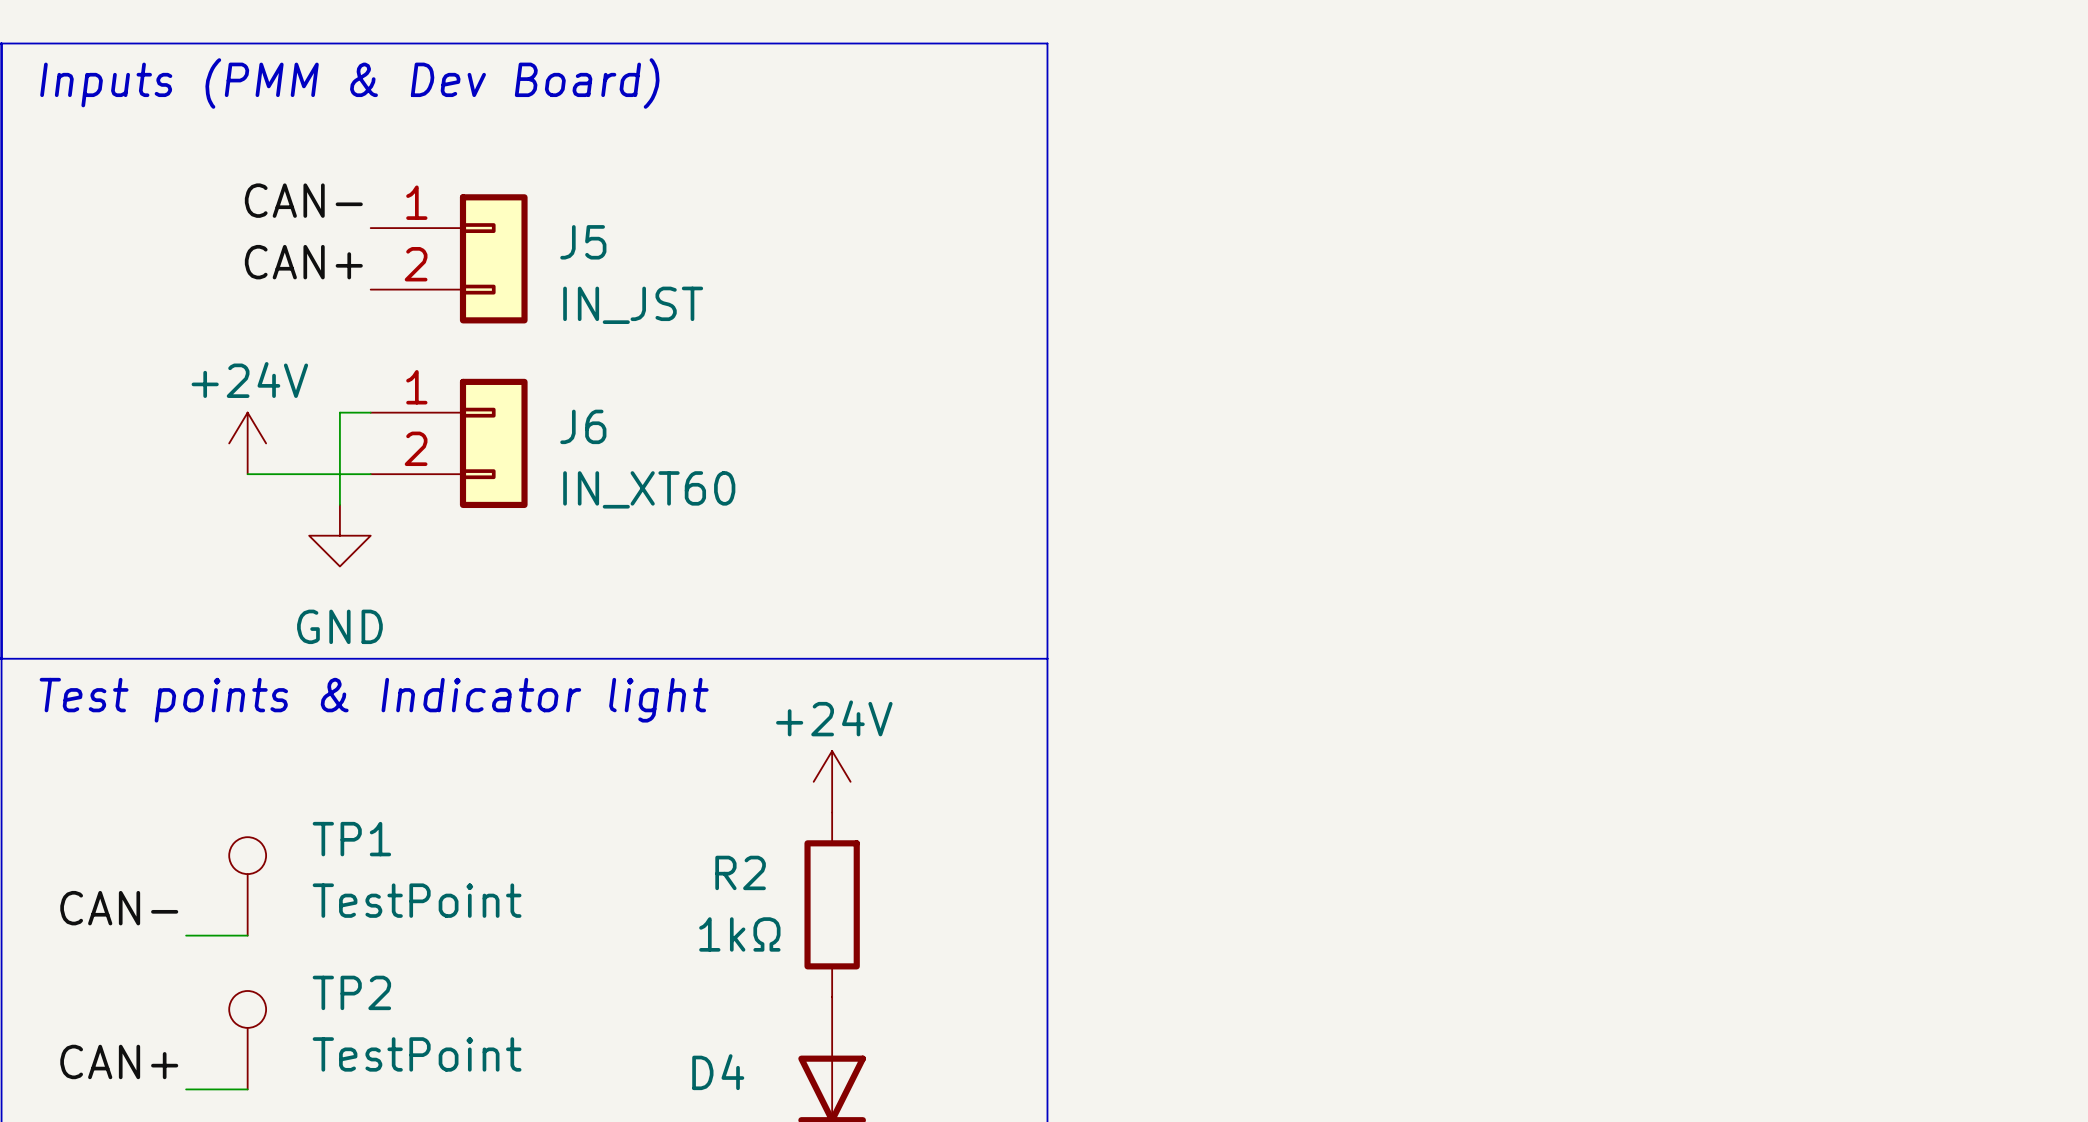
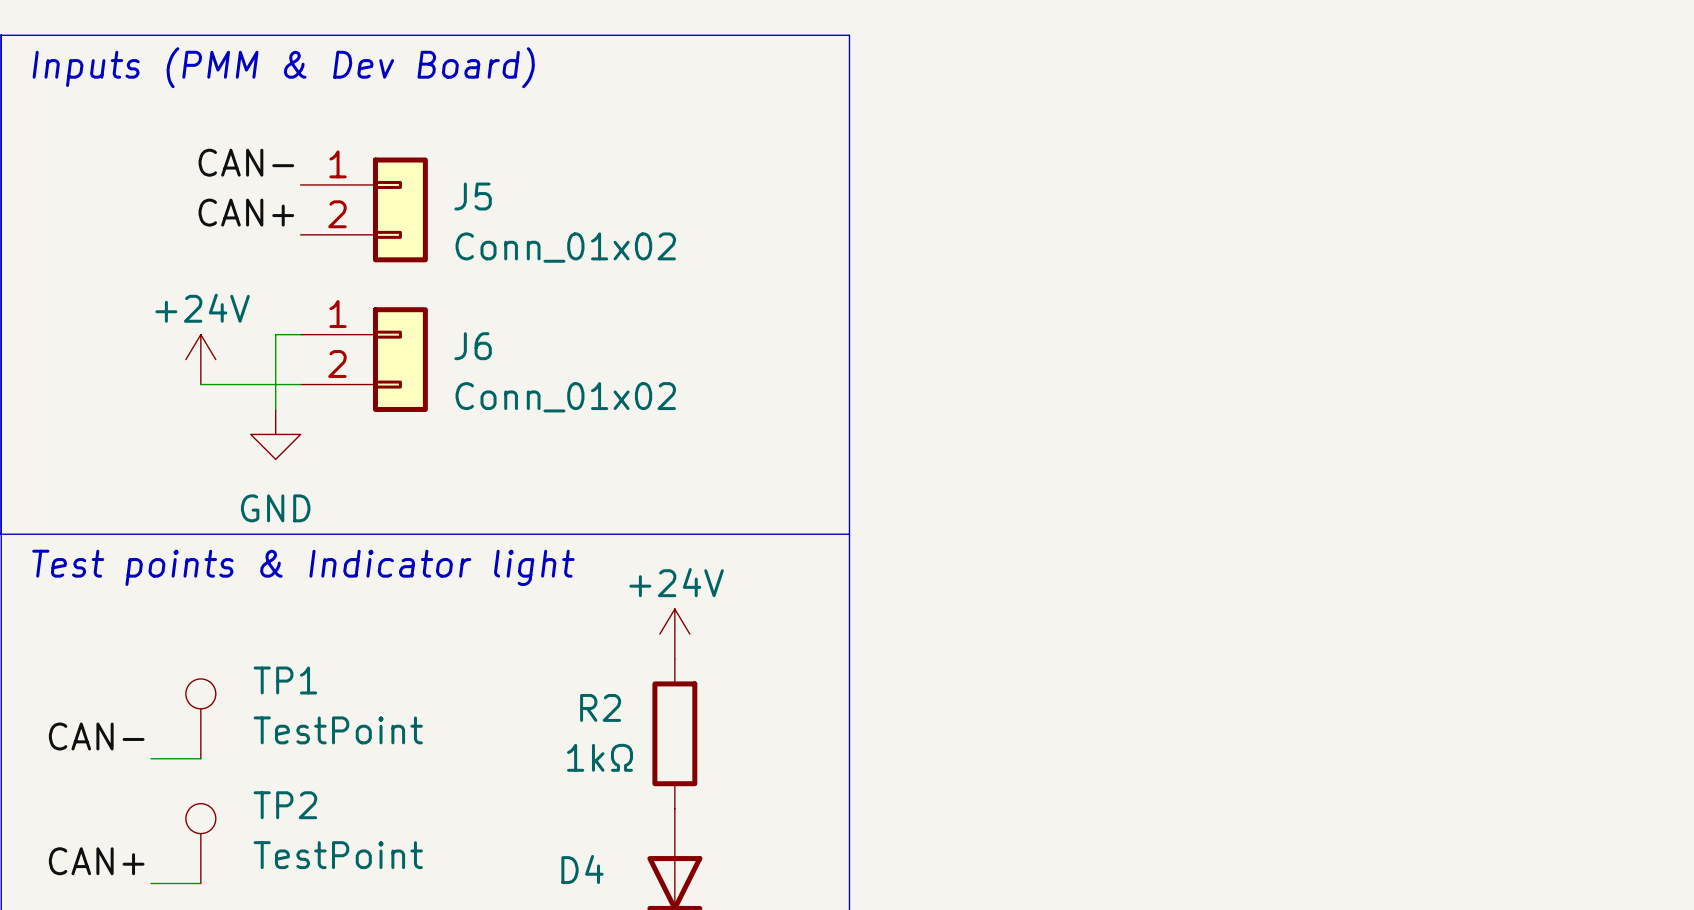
J5 value: IN_JST (633, 305) -> Conn_01x02 (565, 247)
J6 value: IN_XT60 (649, 489) -> Conn_01x02 (565, 397)

